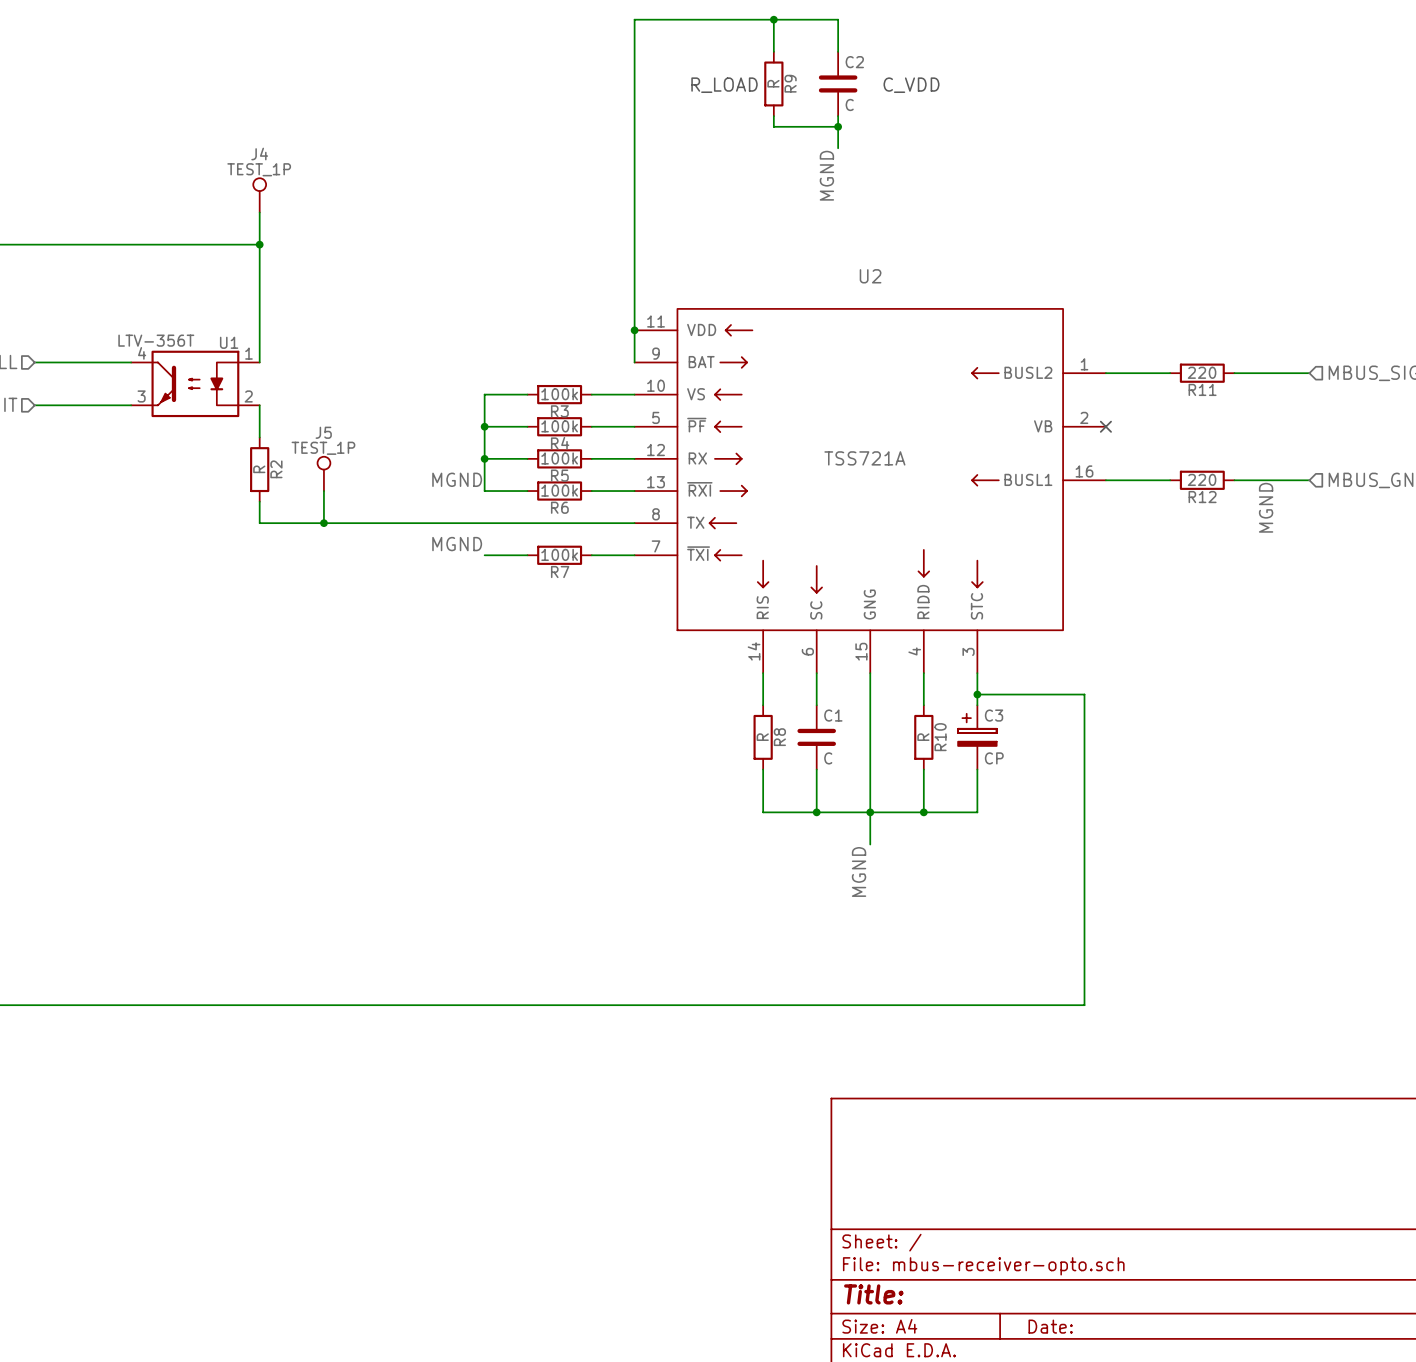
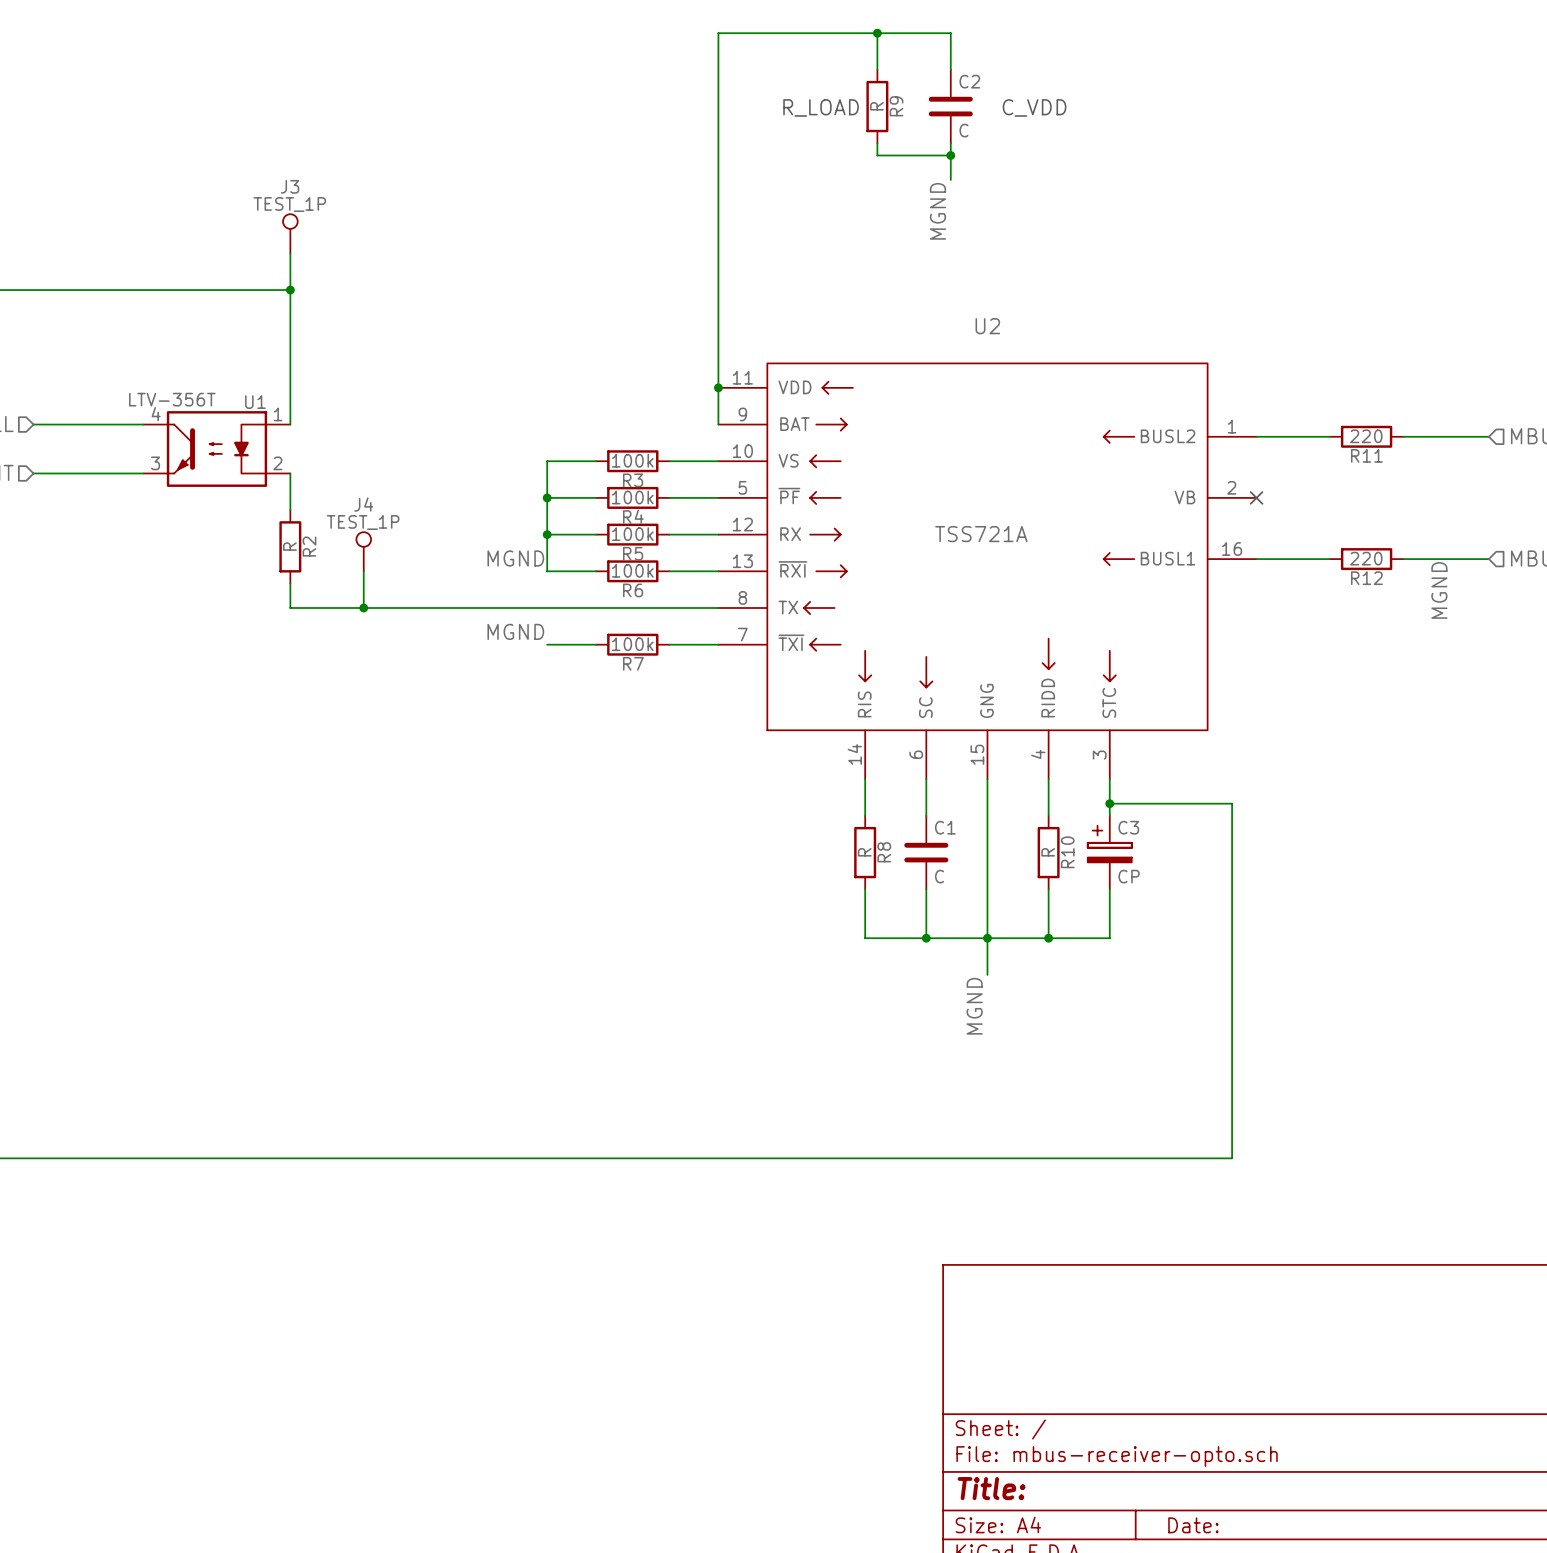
J4 name: J4 (259, 154) -> J3 (290, 186)
J5 name: J5 (323, 432) -> J4 (363, 504)

